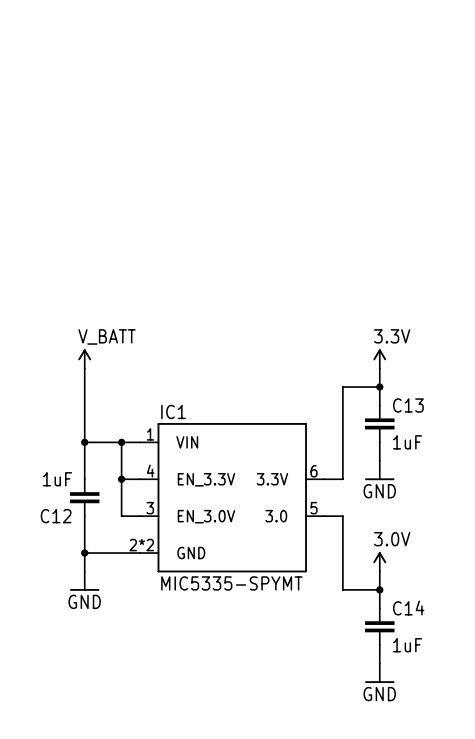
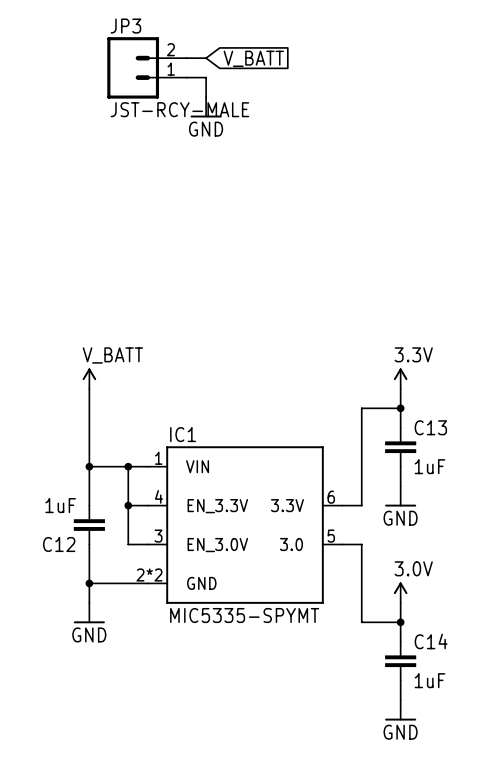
wire: none -> (186, 58) (206, 58)
global label: none -> V_BATT (253, 58)
JP3: none -> JST-RCY-MALE (146, 67)
wire: none -> (186, 77) (206, 77) (206, 97)
power symbol: none -> GND (206, 107)

